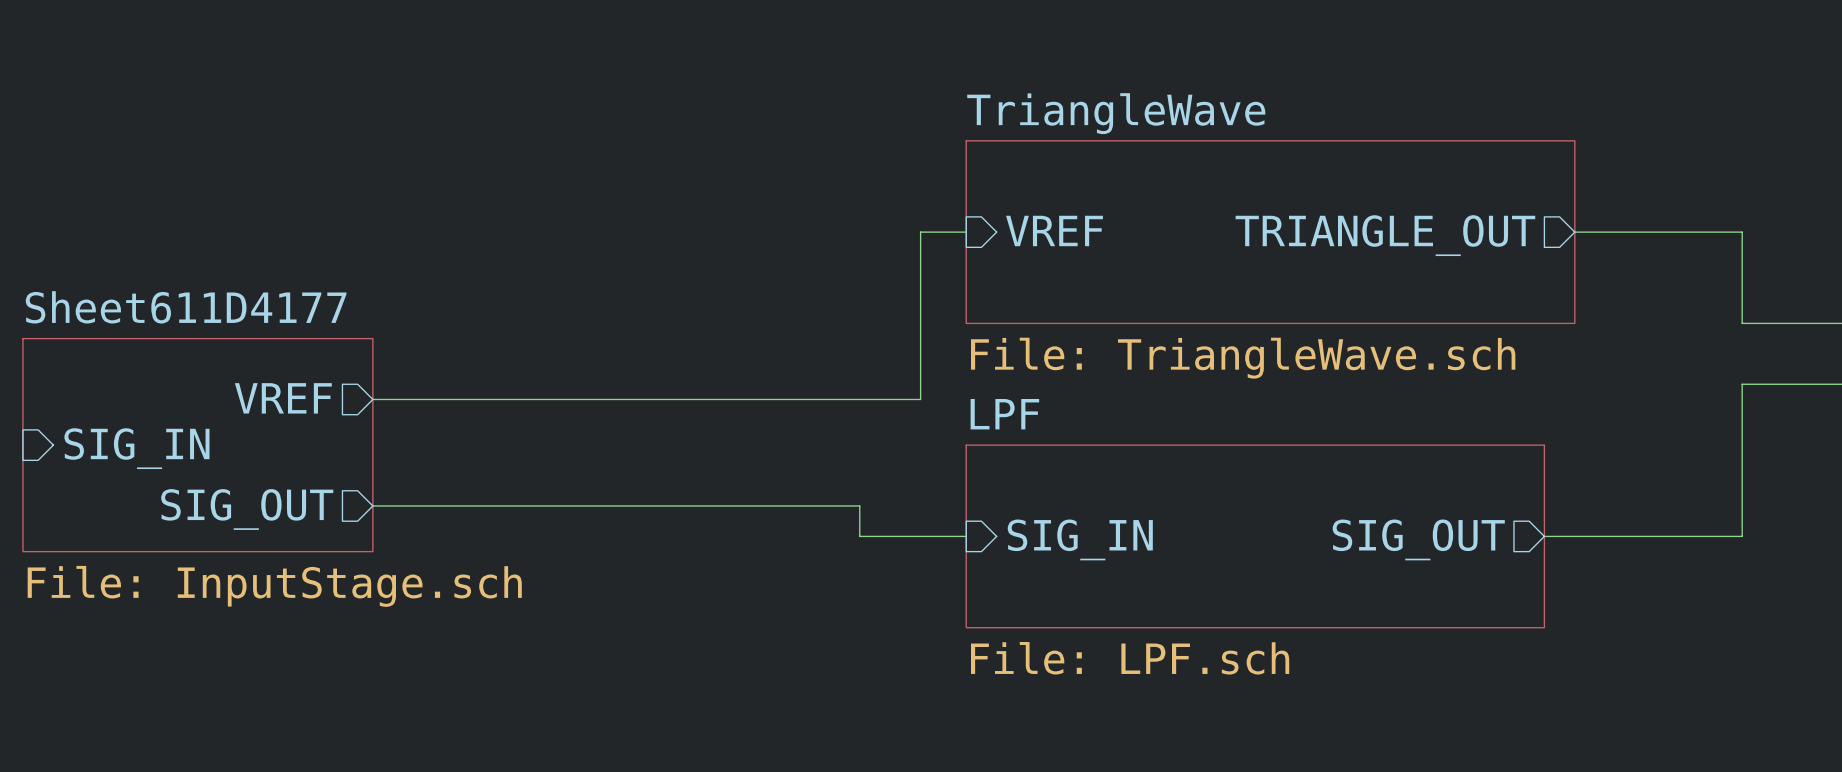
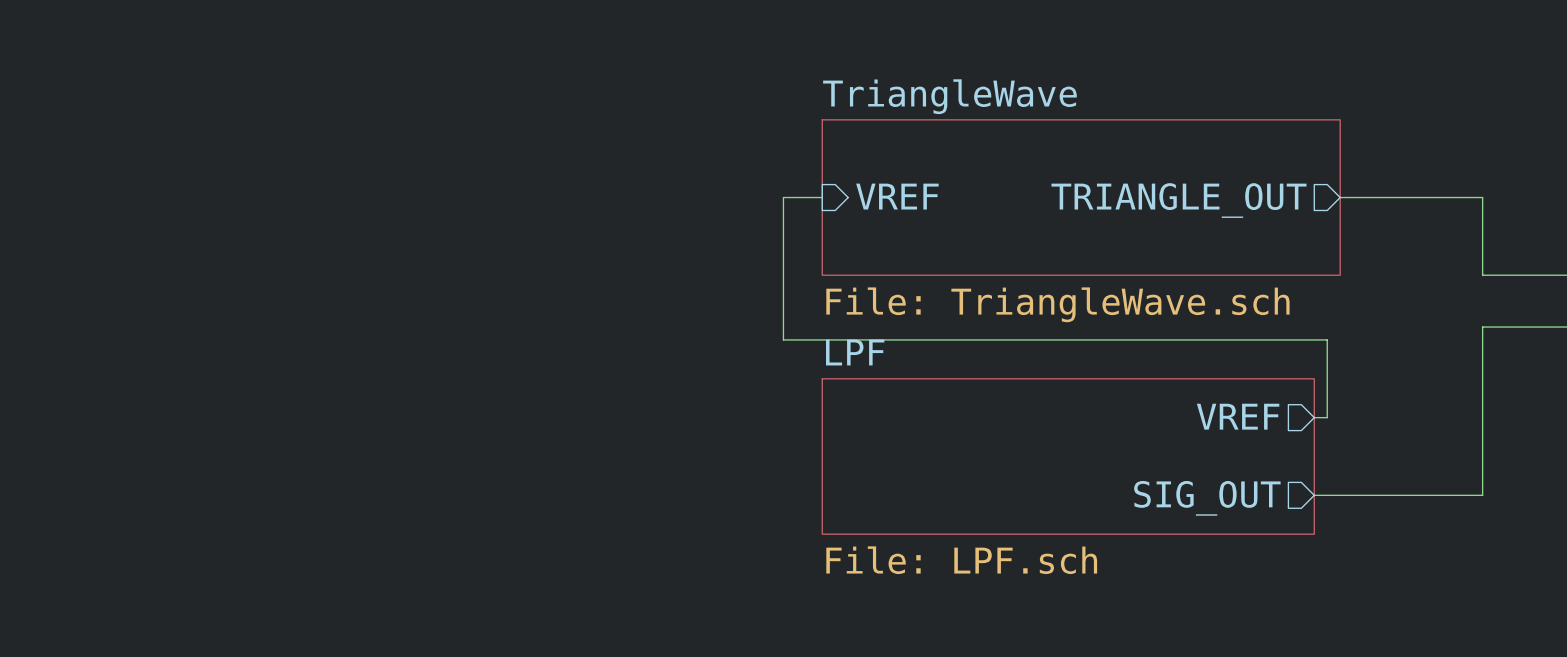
sheet pin: VREF (283, 398) -> none
wire: (372, 399) (920, 399) -> (1314, 417) (1327, 417) (1327, 339) (783, 339)
sheet Sheet611D4177: File: InputStage.sch (197, 445) -> none
sheet pin: SIG_IN (136, 448) -> none
sheet pin: none -> VREF (1238, 416)
wire: (372, 505) (859, 505) (859, 536) (966, 536) -> none
sheet pin: SIG_OUT (247, 509) -> none
wire: (1544, 536) (1742, 536) -> (1314, 495) (1482, 495) (1482, 456)
sheet pin: SIG_IN (1080, 539) -> none
sheet pin position: SIG_OUT (1418, 539) -> SIG_OUT (1207, 498)

